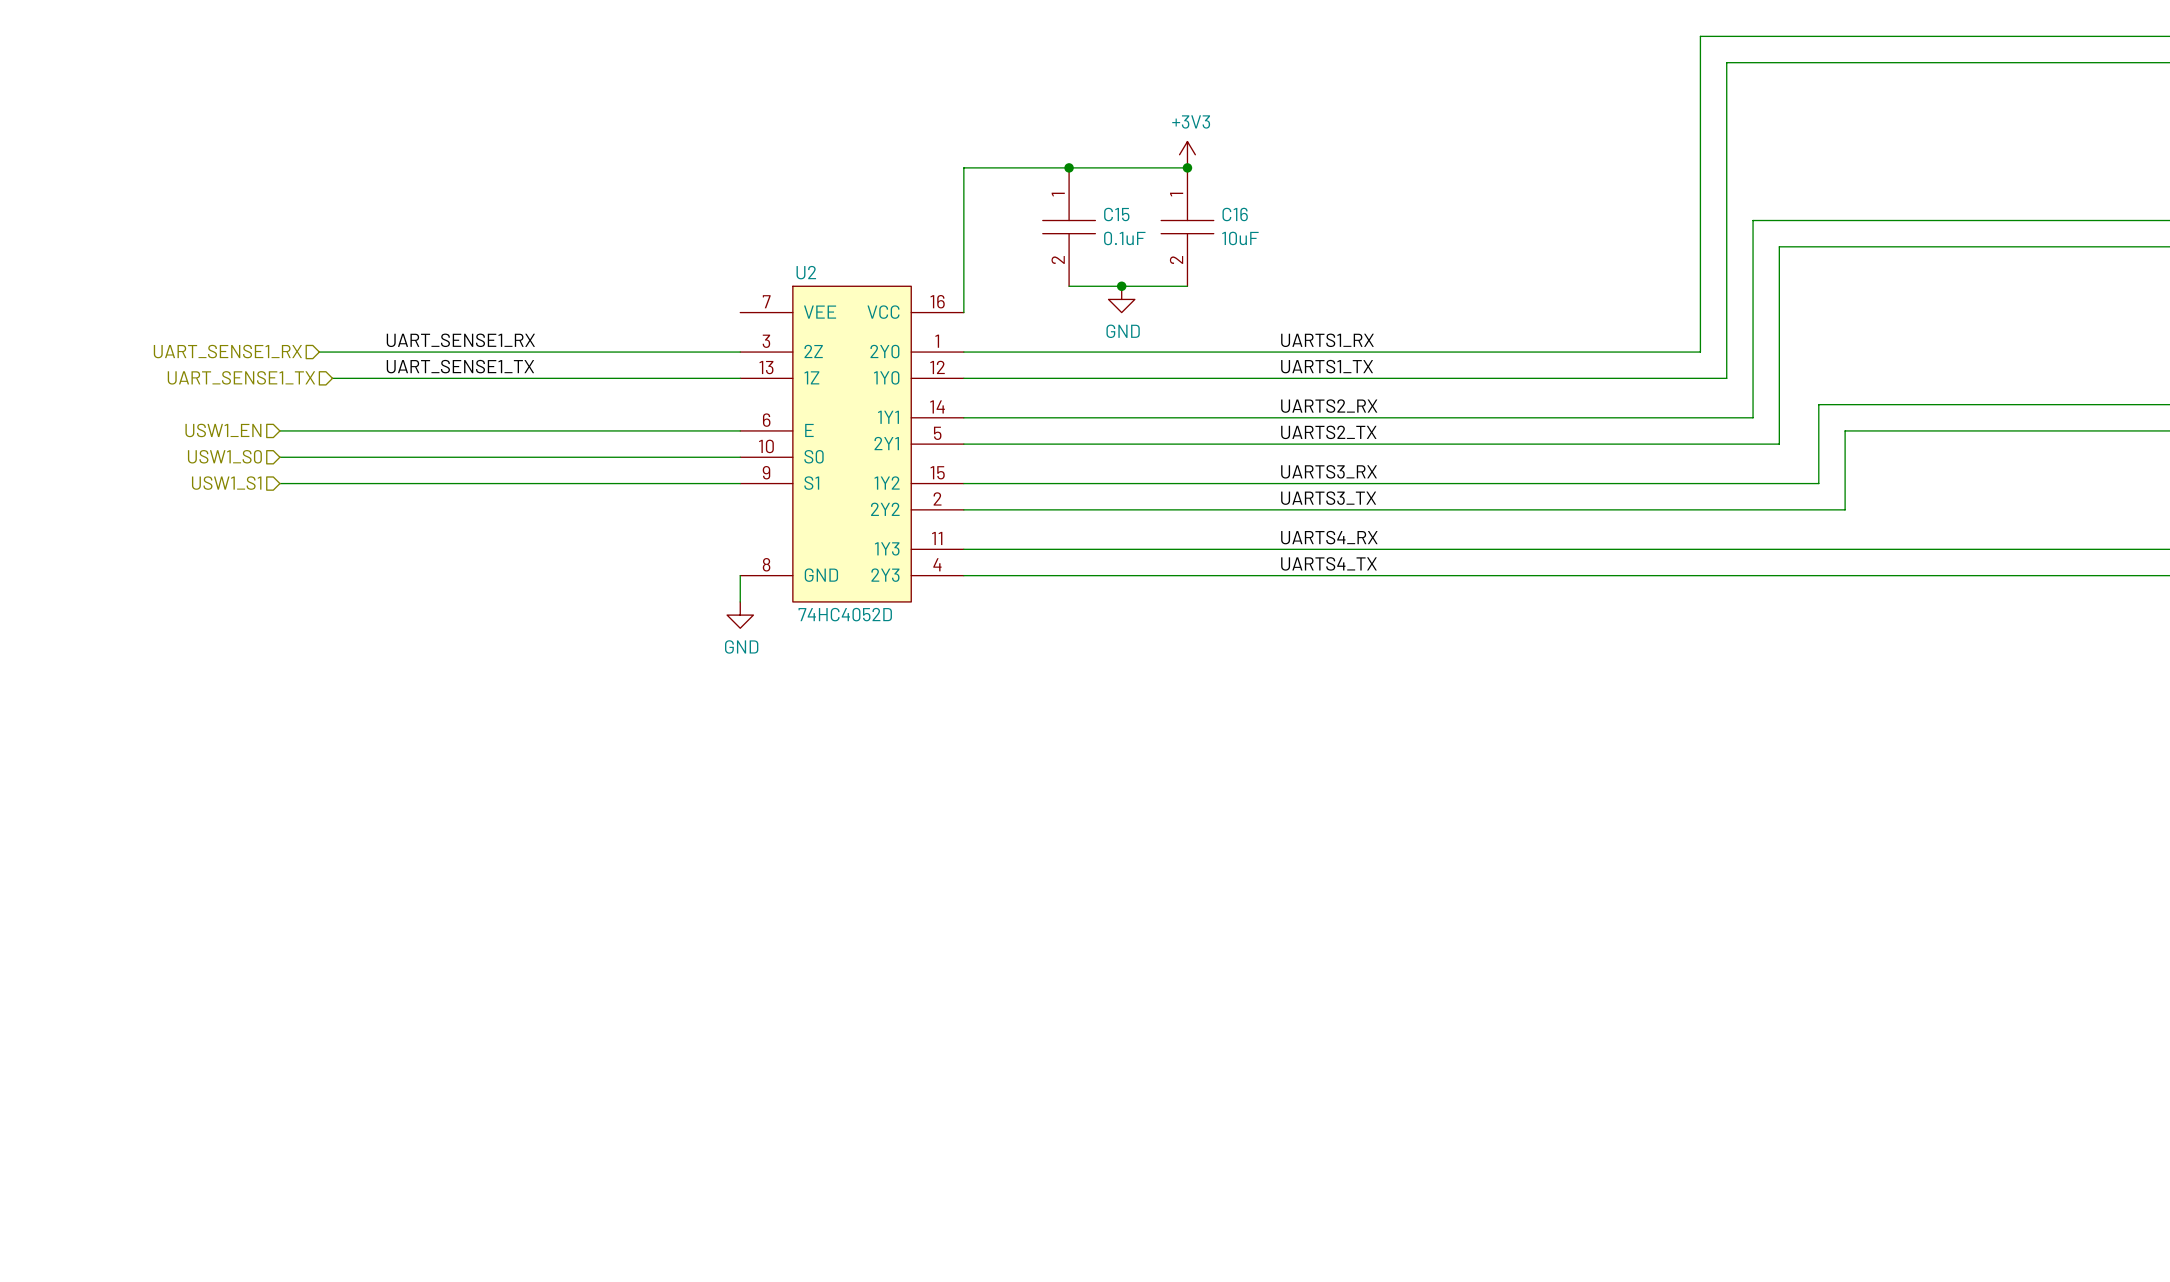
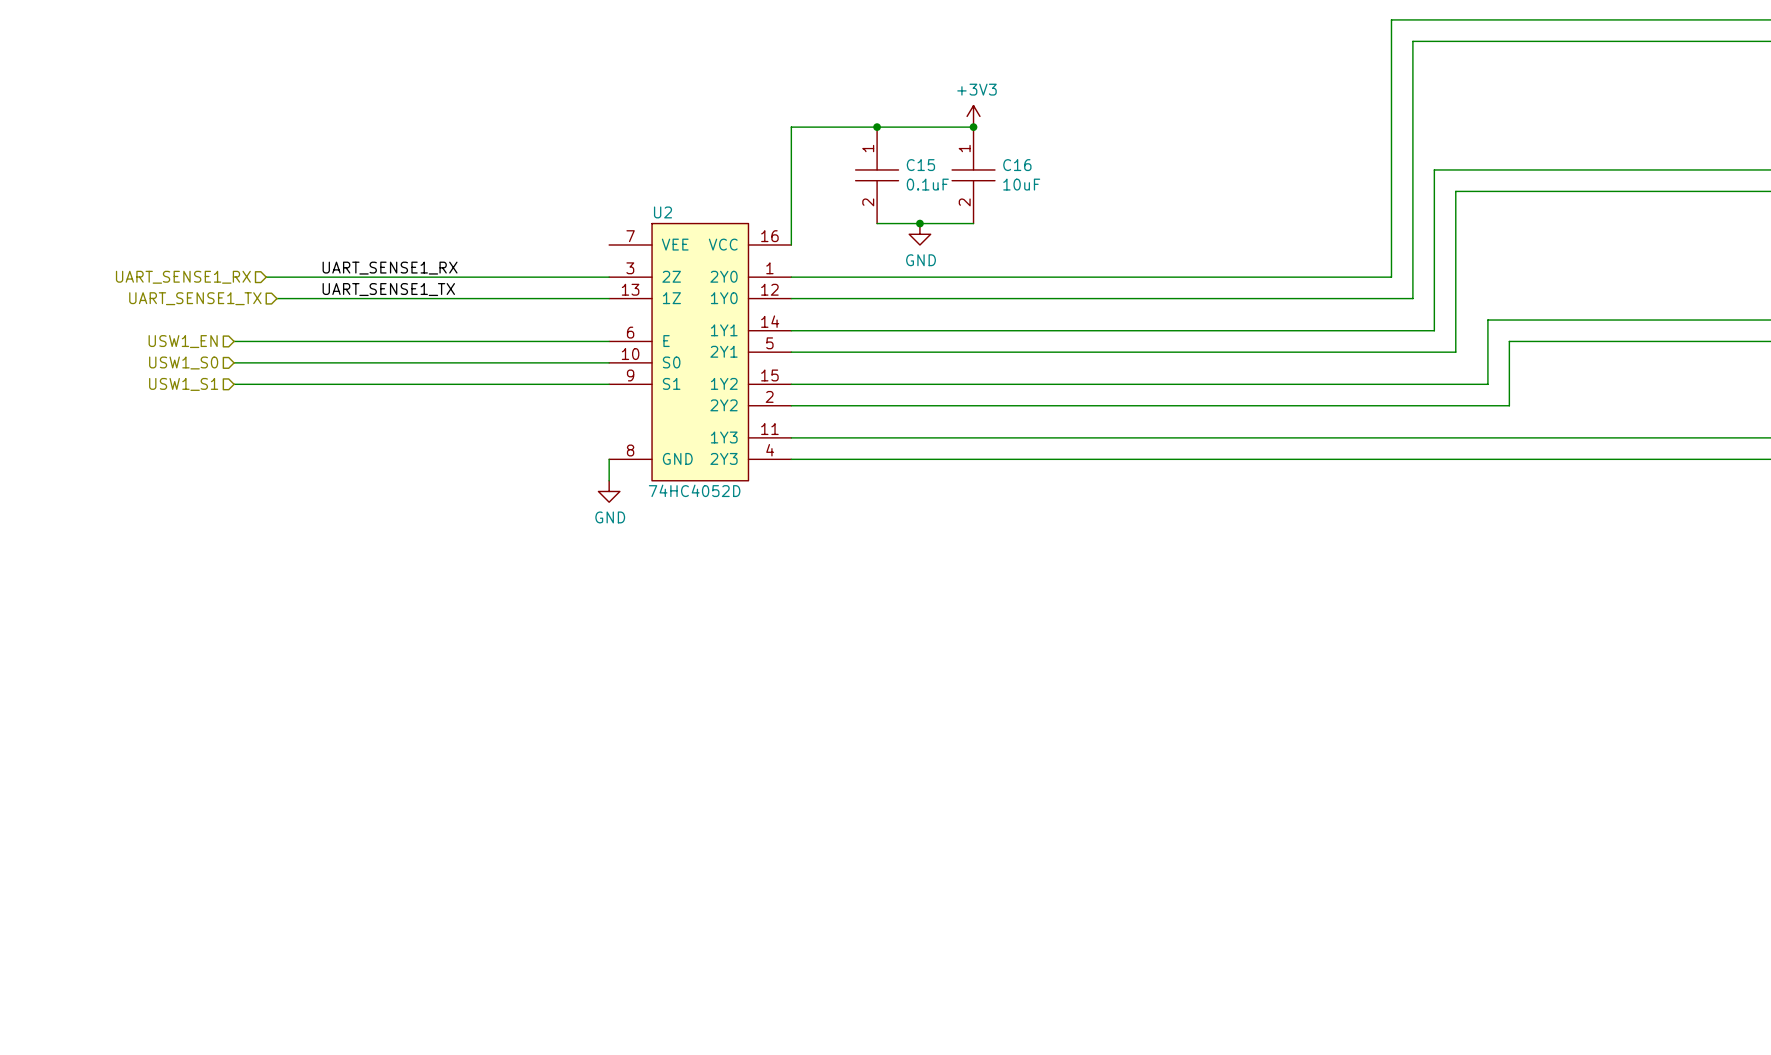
label: UARTS1_RX (1327, 340) -> none
label: UARTS1_TX (1327, 366) -> none
label: UARTS2_RX (1329, 406) -> none
label: UARTS2_TX (1328, 432) -> none
label: UARTS3_RX (1329, 471) -> none
label: UARTS3_TX (1328, 498) -> none
label: UARTS4_RX (1329, 537) -> none
label: UARTS4_TX (1328, 563) -> none

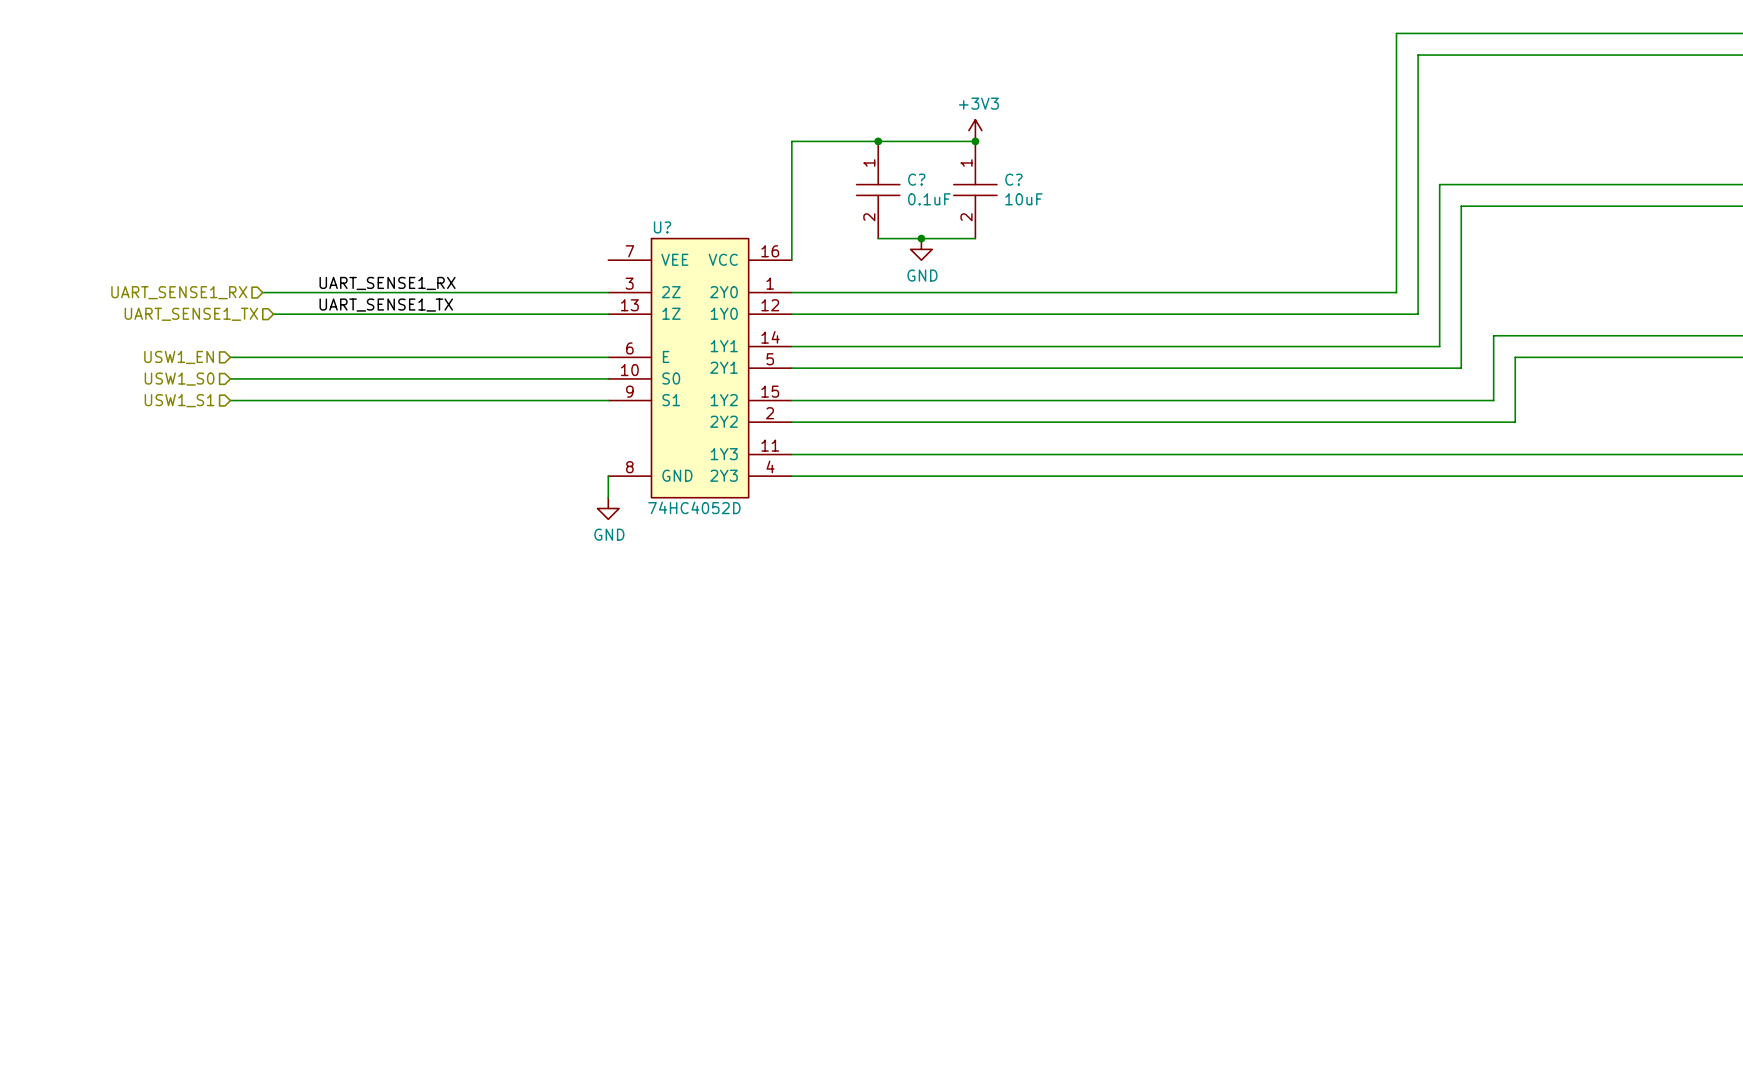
C15 name: C15 (920, 165) -> C? (916, 179)
C16 name: C16 (1017, 165) -> C? (1013, 179)
U2 name: U2 (663, 212) -> U? (662, 227)

